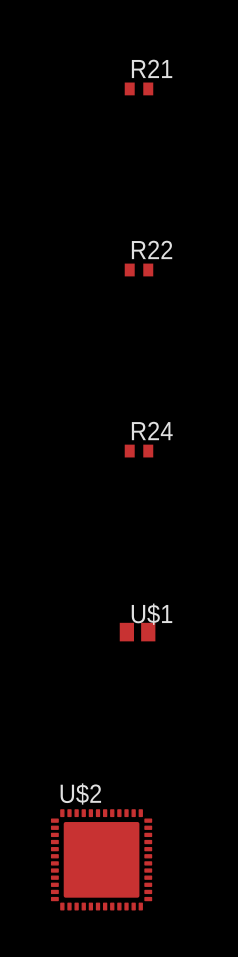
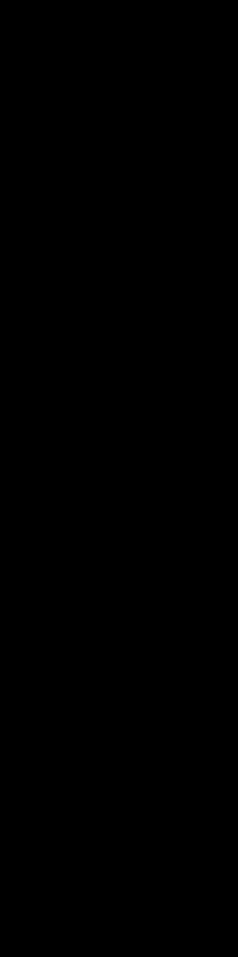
R21: (138, 88) -> none
R22: (138, 269) -> none
R24: (138, 451) -> none
U$1: (137, 632) -> none
U$2: (101, 859) -> none

